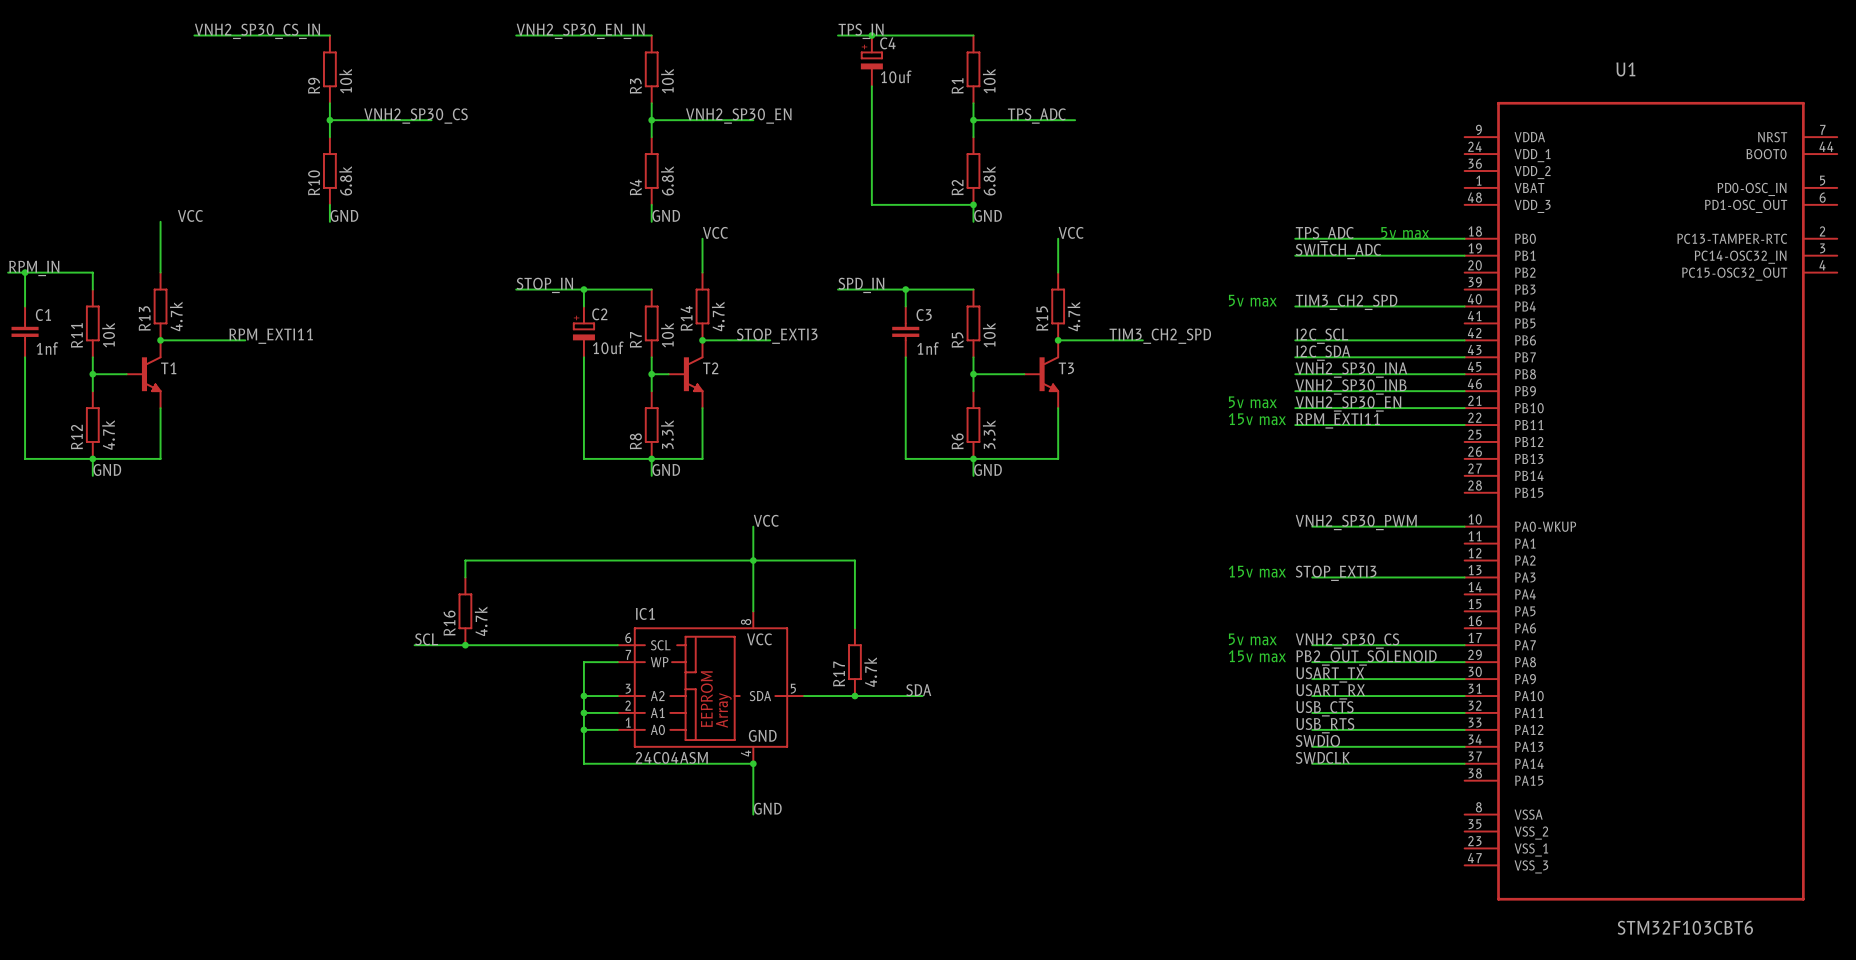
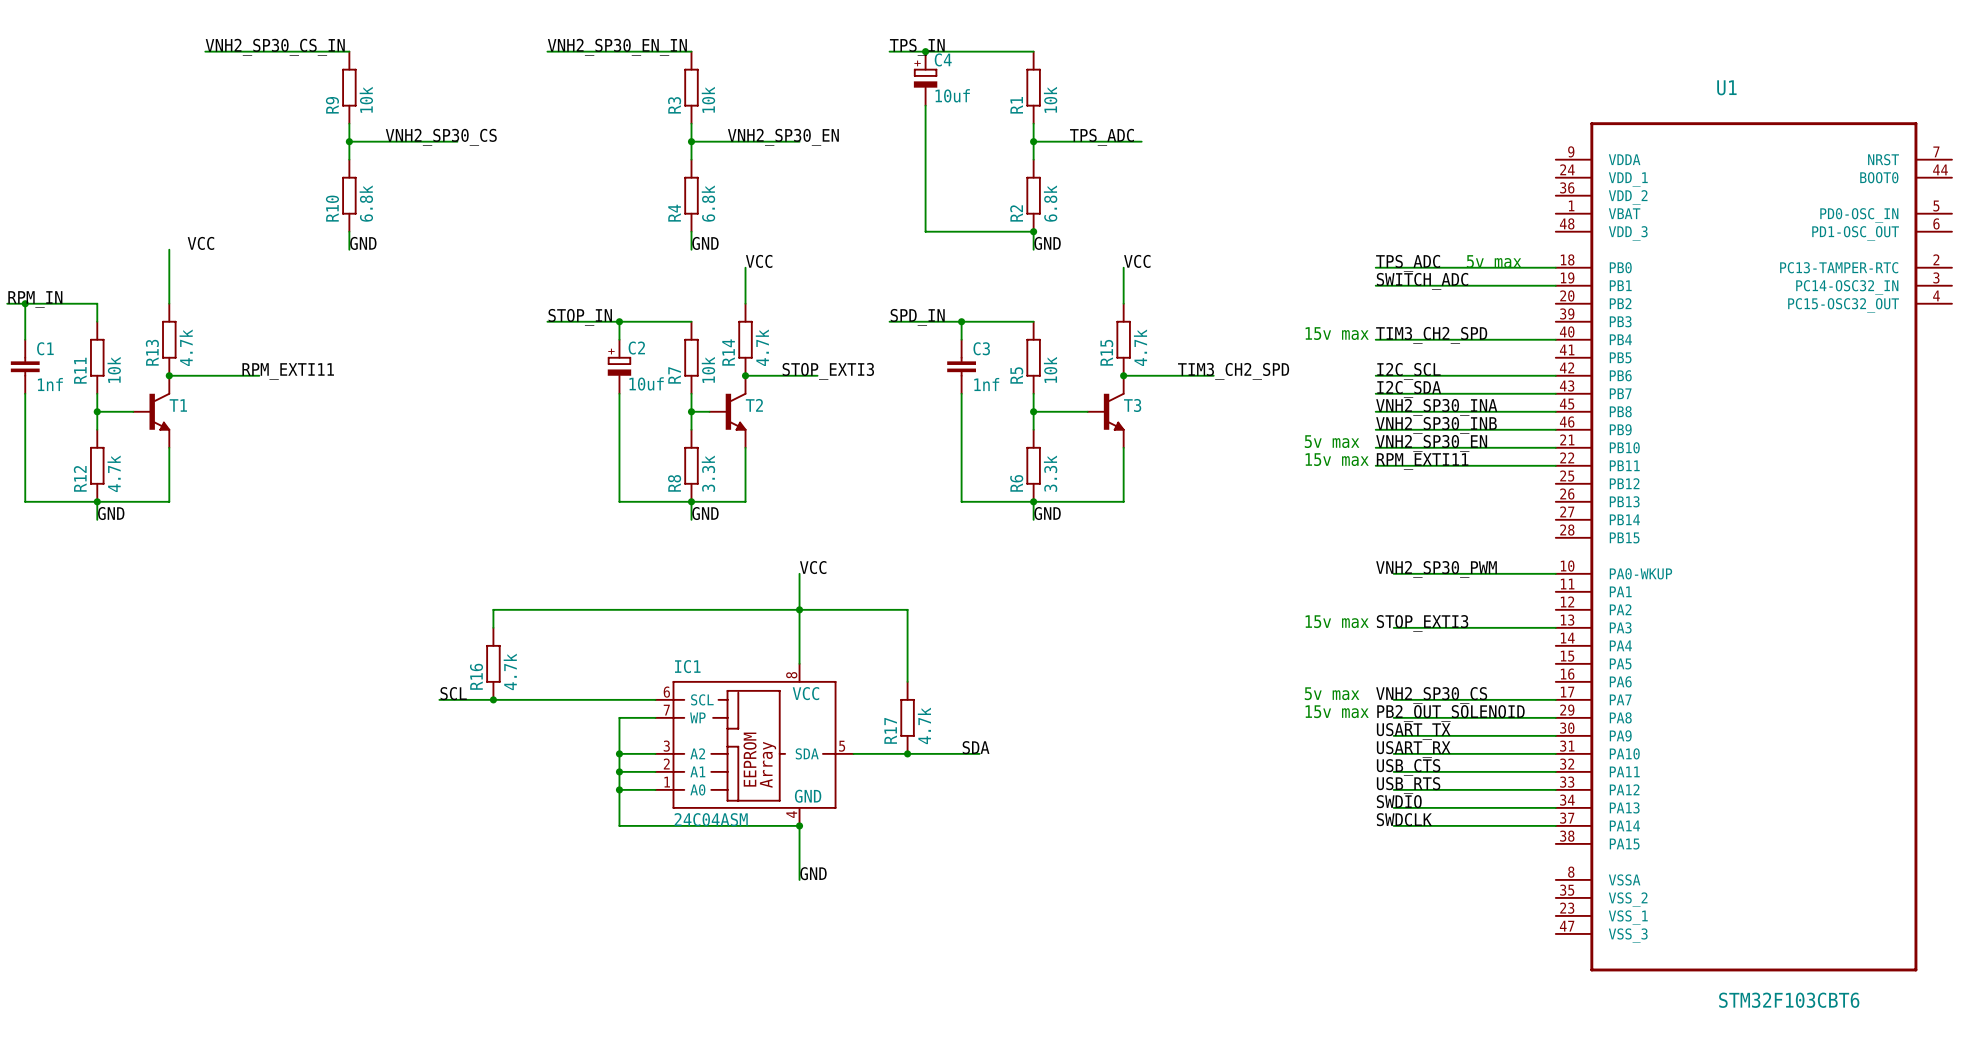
text: 5v max (1252, 300) -> 15v max (1337, 333)

